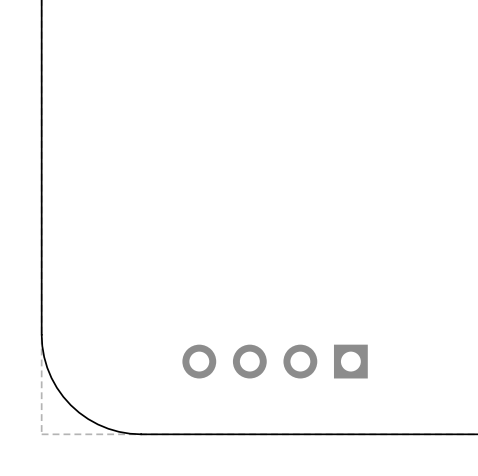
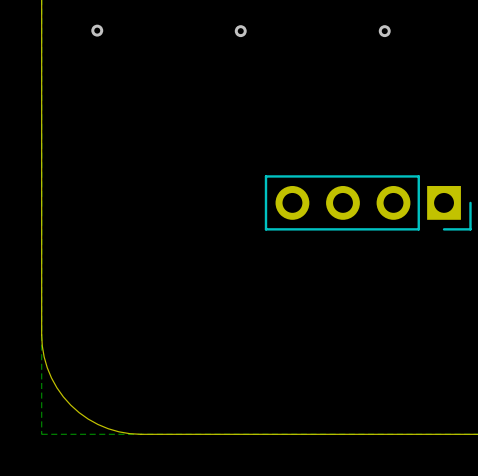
via: none -> (97, 30)
via: none -> (240, 31)
via: none -> (384, 31)
part side: top (275, 361) -> bottom (368, 202)

